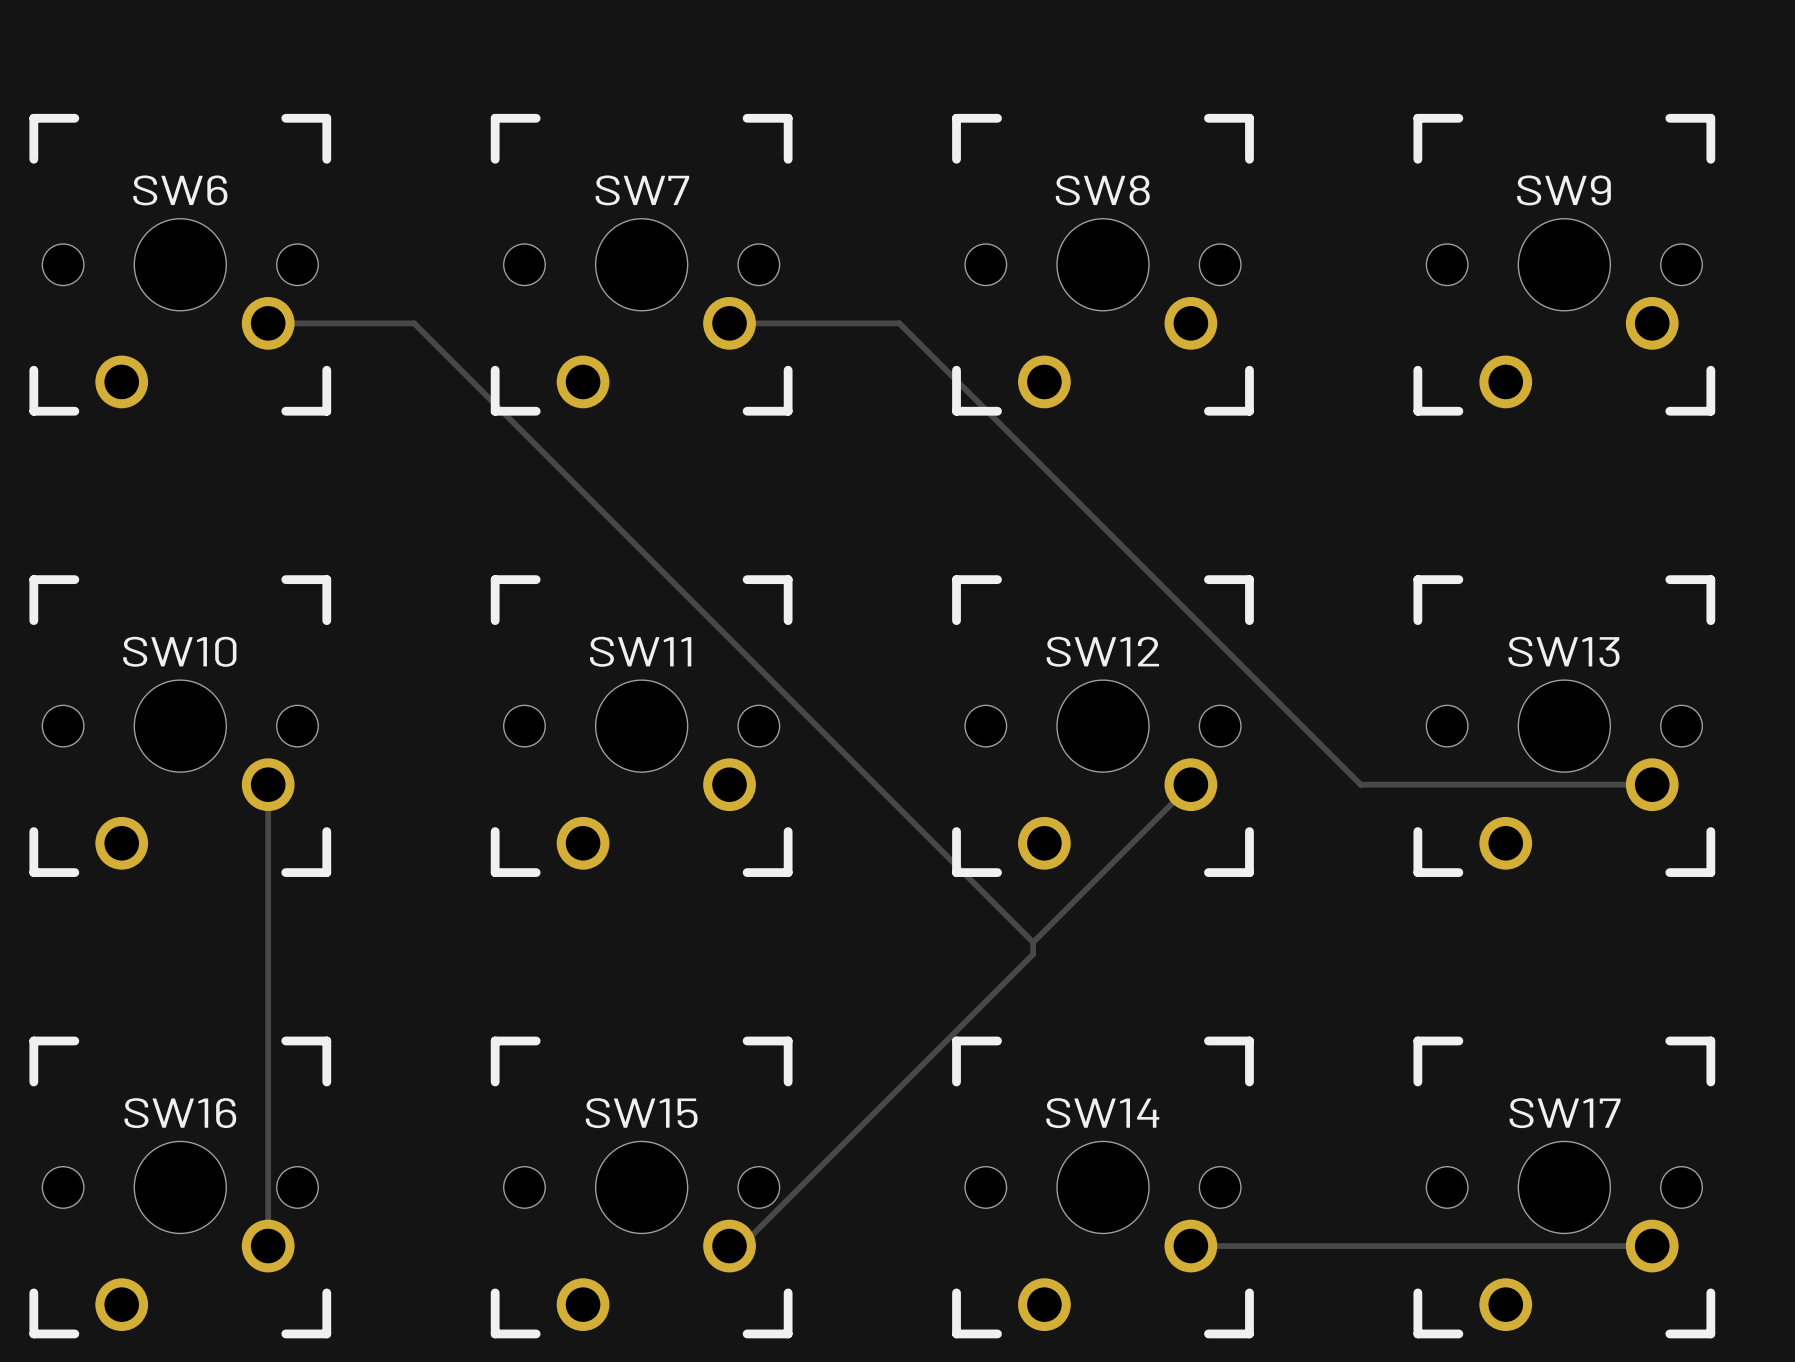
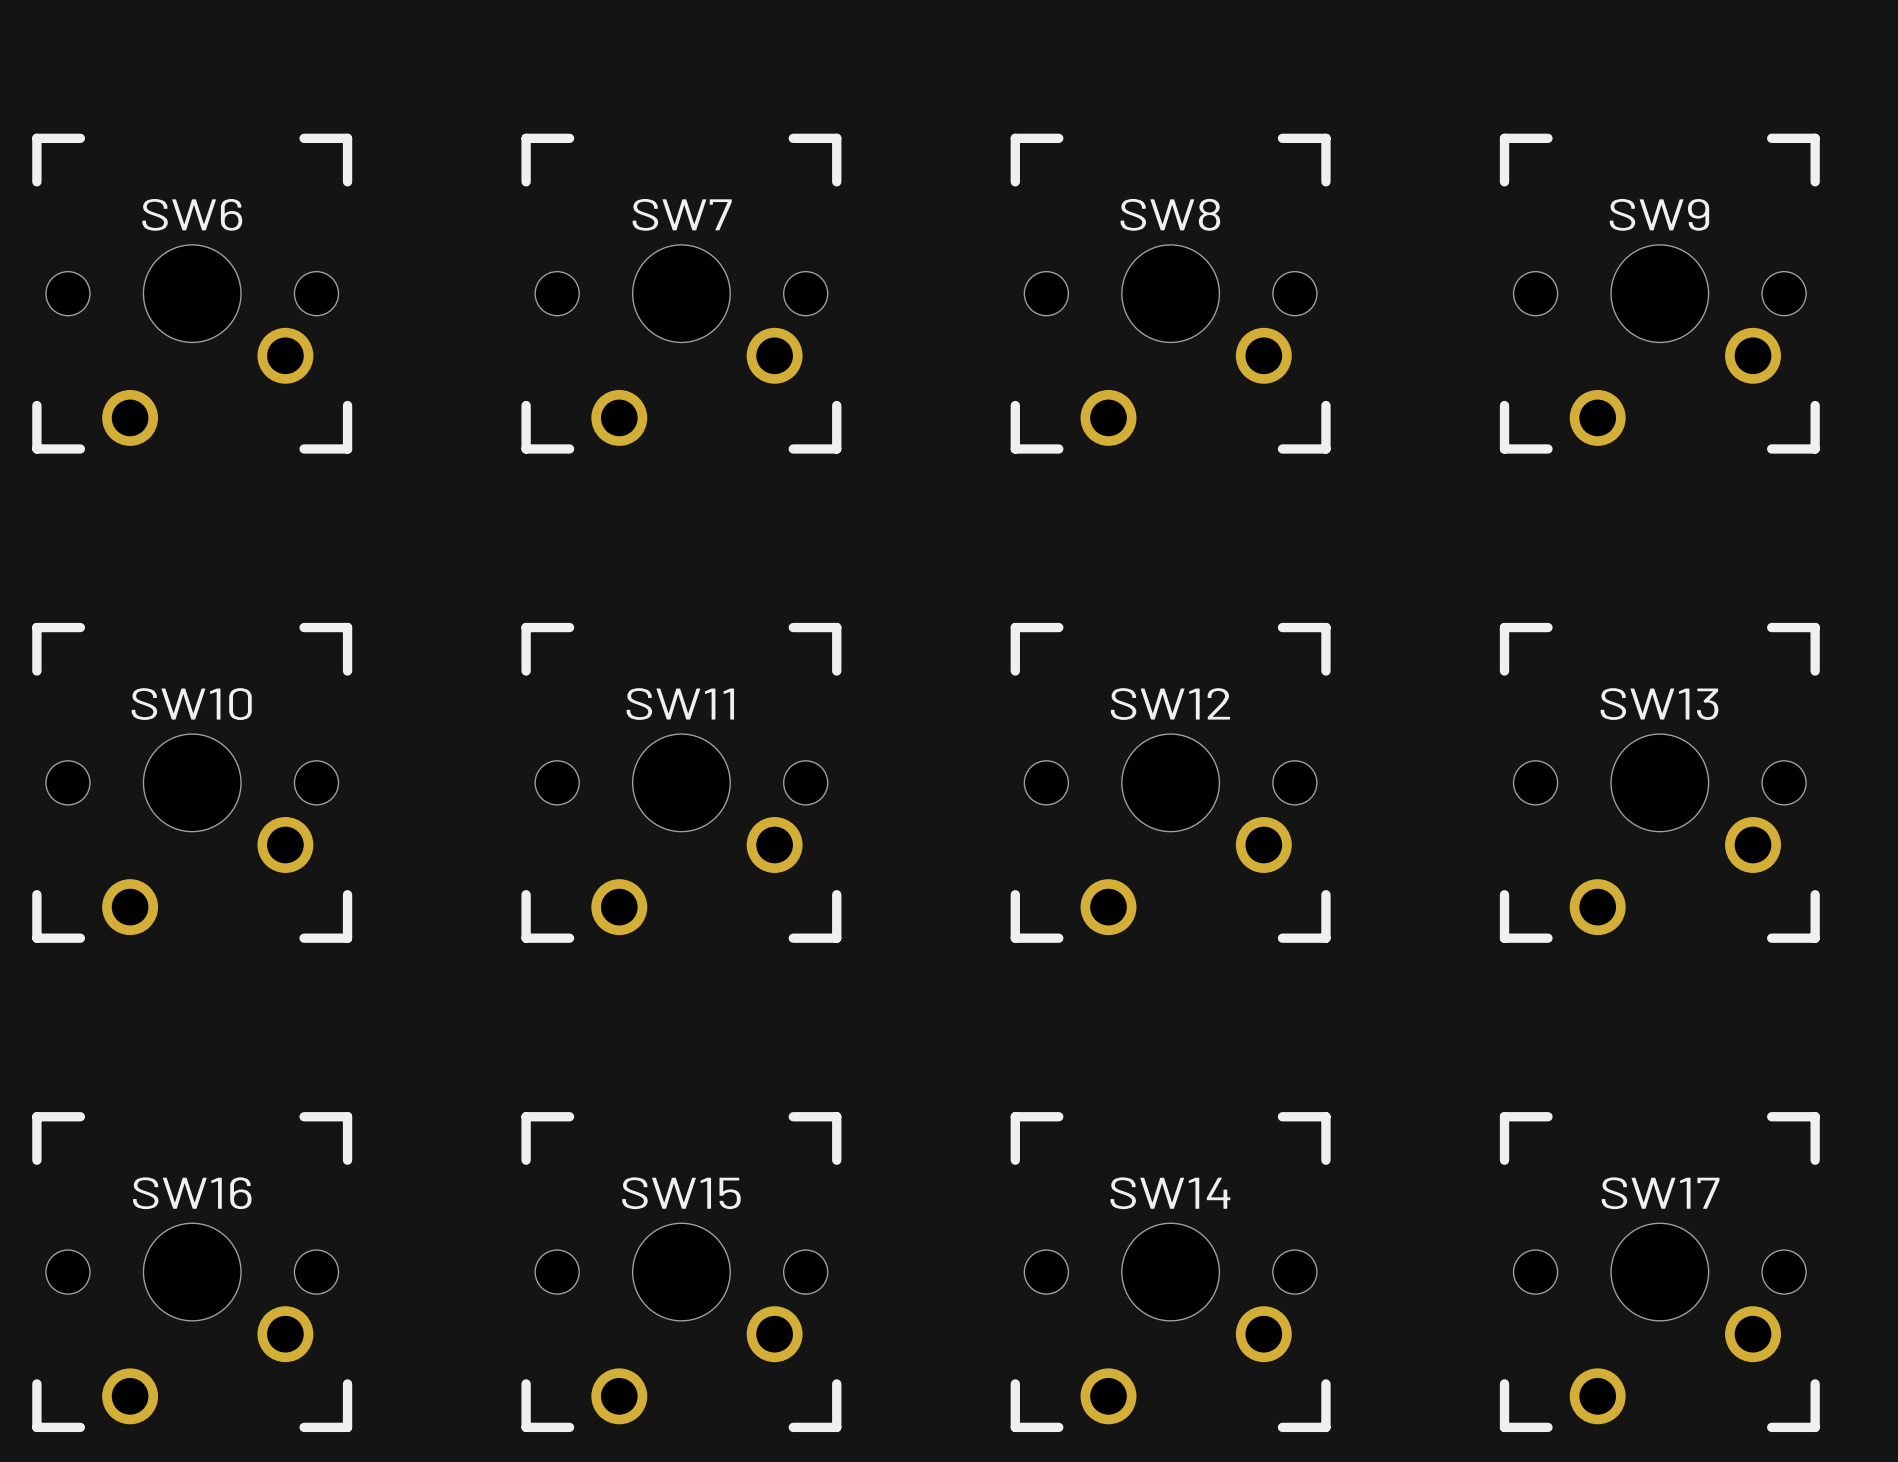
track: (268, 323) (414, 323) (1033, 942) -> none
track: (729, 323) (899, 323) (1360, 784) (1652, 784) -> none
track: (268, 784) (268, 1246) -> none
track: (1190, 784) (1033, 942) -> none
track: (1033, 942) (1033, 954) (741, 1246) (729, 1246) -> none
track: (1190, 1246) (1652, 1246) -> none

